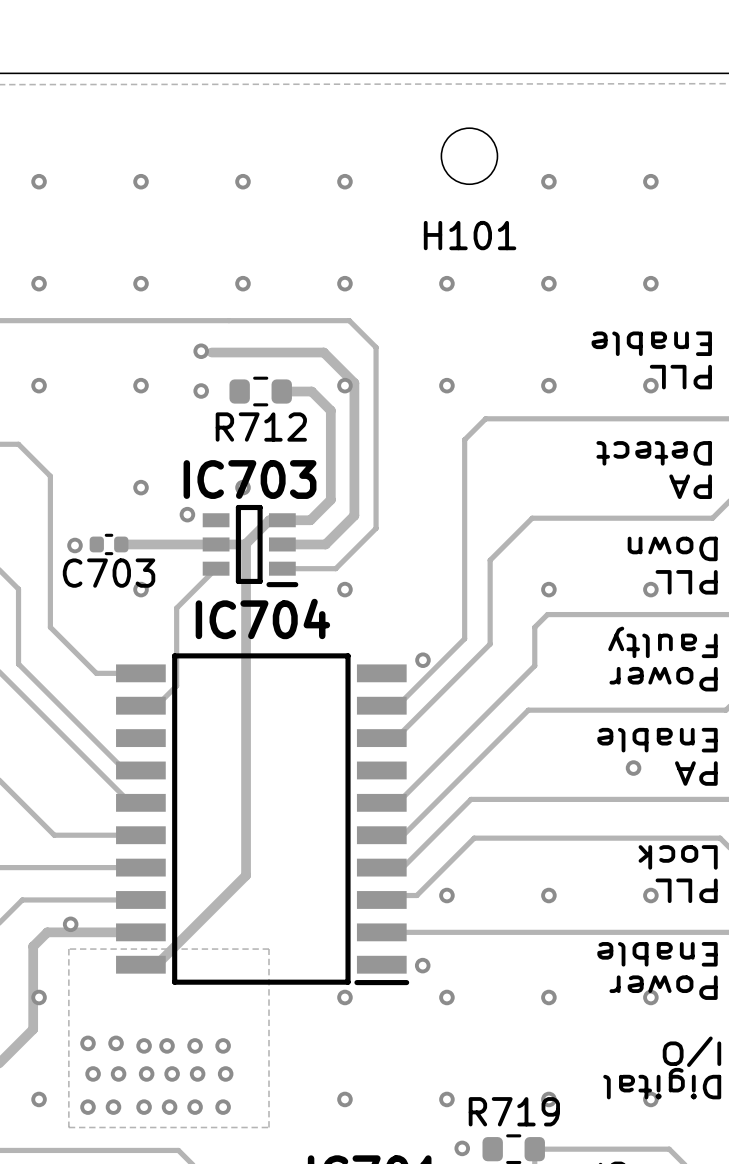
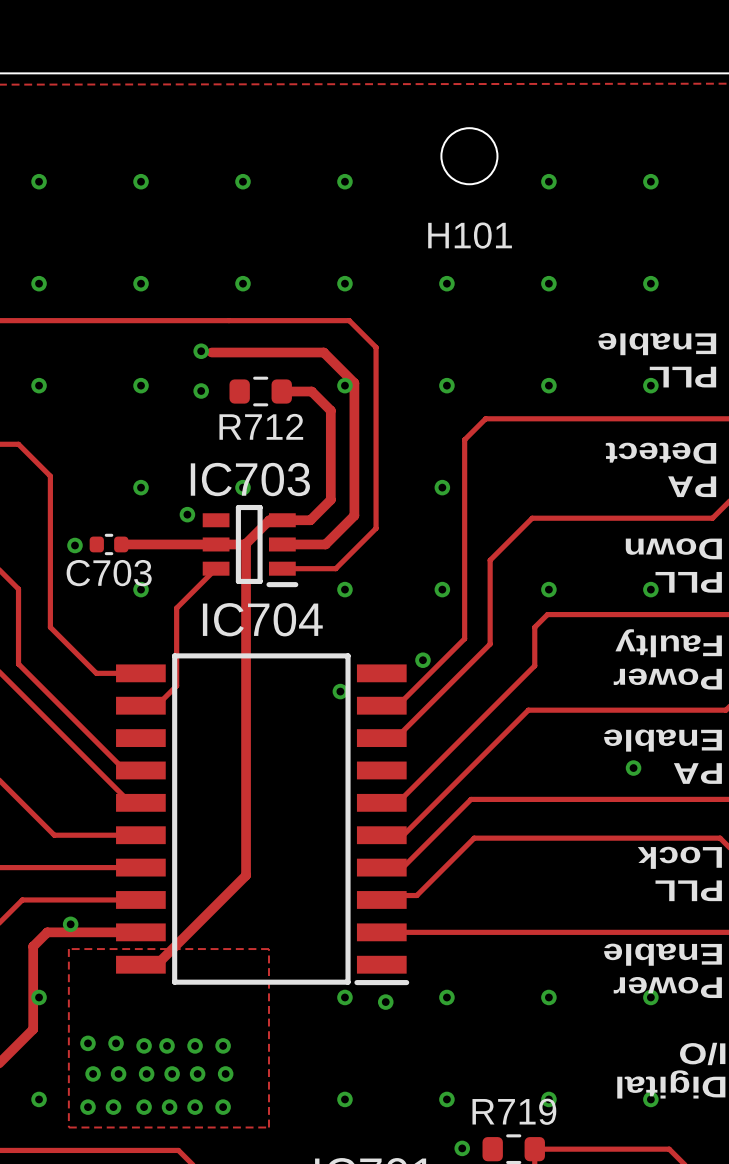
via: none -> (442, 487)
via: none -> (442, 589)
via: none -> (340, 691)
via: (446, 895) -> none
via: (548, 895) -> none
via: (650, 895) -> none
via position: (422, 965) -> (385, 1002)

